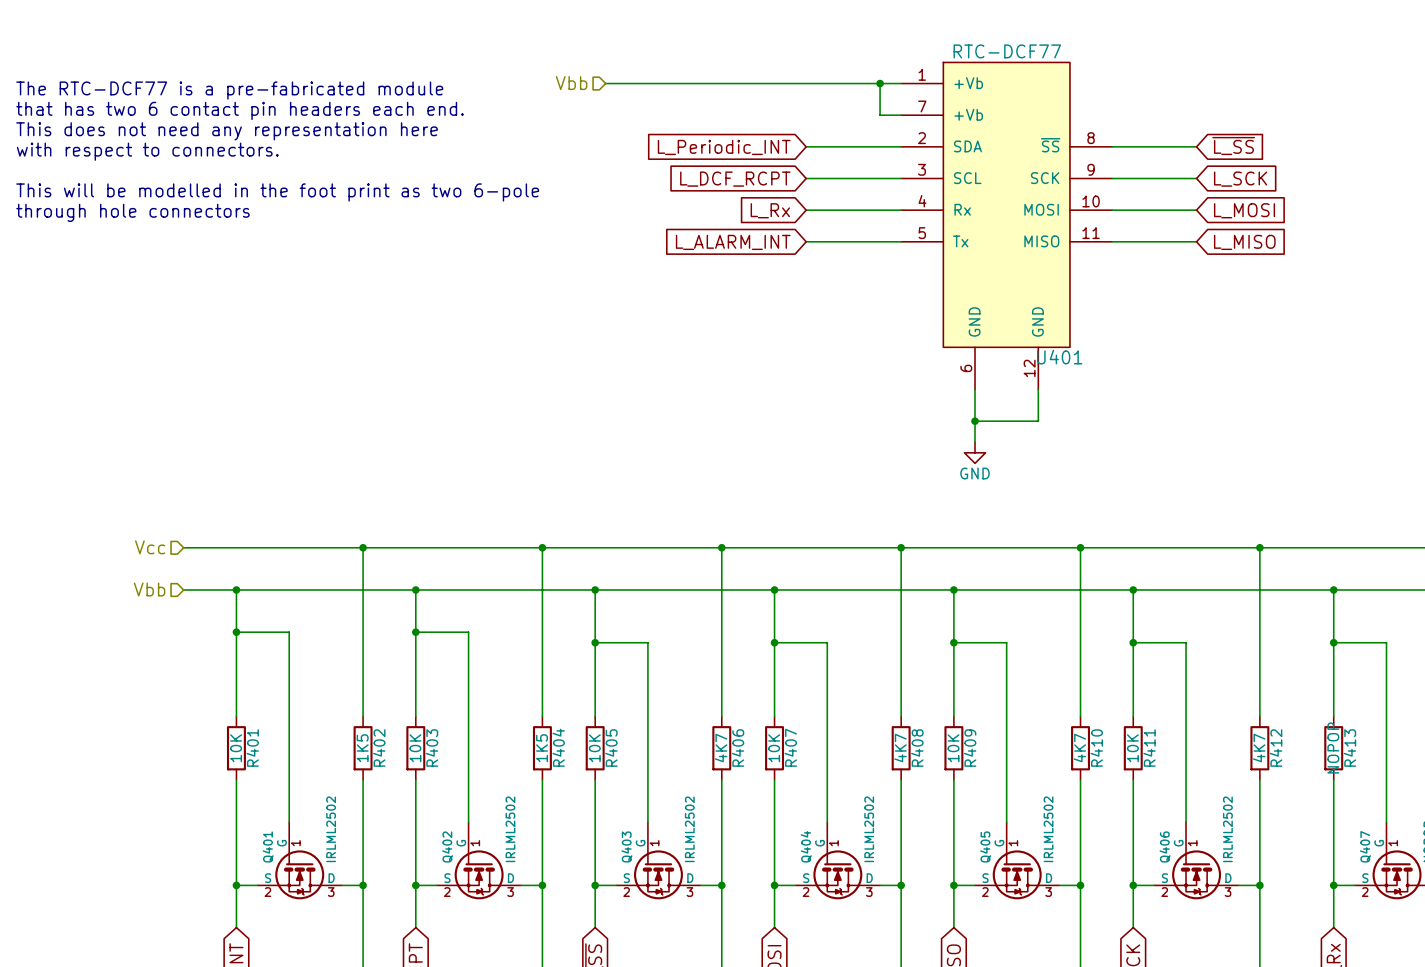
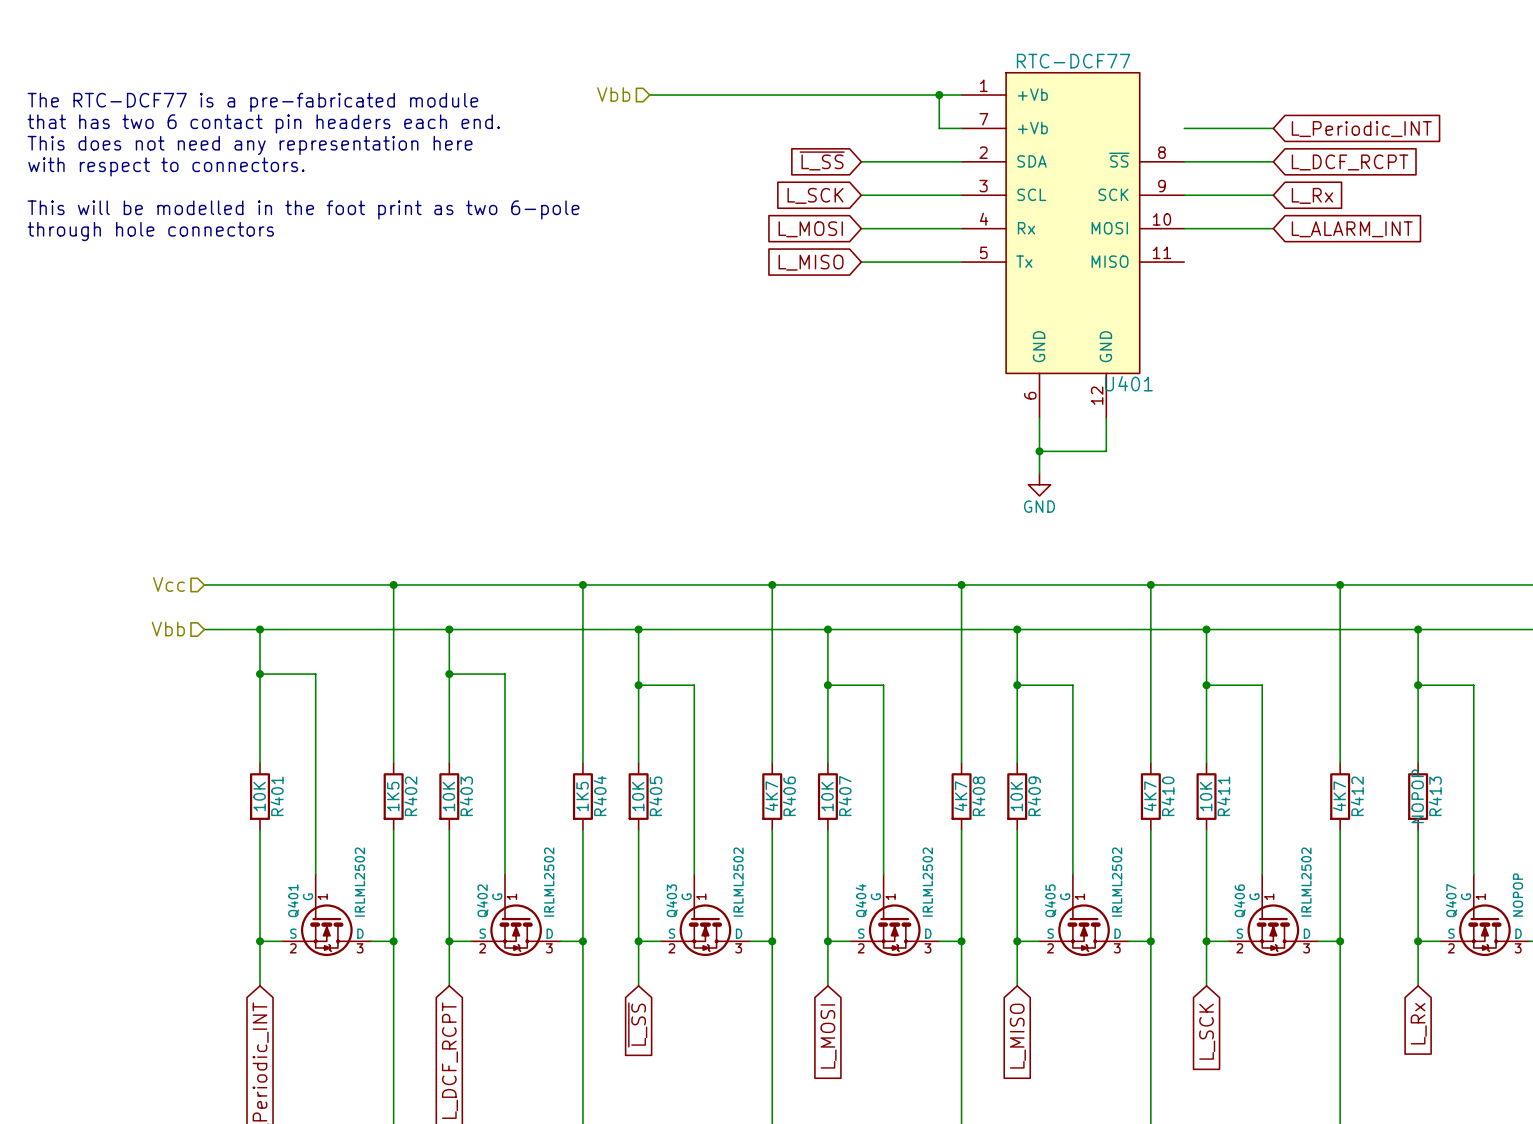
global label: none -> L_Periodic_INT (1361, 129)
global label: ~{L_SS} (1233, 146) -> L_DCF_RCPT (1350, 162)
global label: L_Periodic_INT (724, 147) -> ~{L_SS} (822, 160)
global label: L_DCF_RCPT (735, 179) -> L_SCK (815, 195)
global label: L_SCK (1240, 179) -> L_Rx (1312, 195)
global label: L_Rx (770, 210) -> L_MOSI (810, 229)
global label: L_MOSI (1244, 210) -> L_ALARM_INT (1352, 229)
wire: (1112, 241) (1196, 241) -> (1184, 128) (1273, 128)
global label: L_ALARM_INT (733, 242) -> L_MISO (811, 262)
global label: L_MISO (1244, 242) -> none

